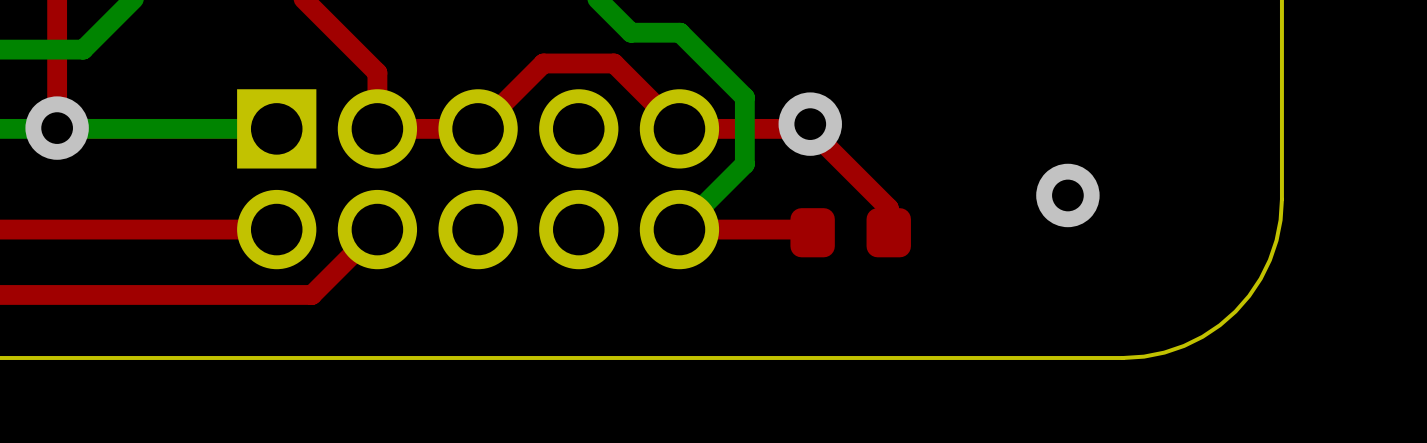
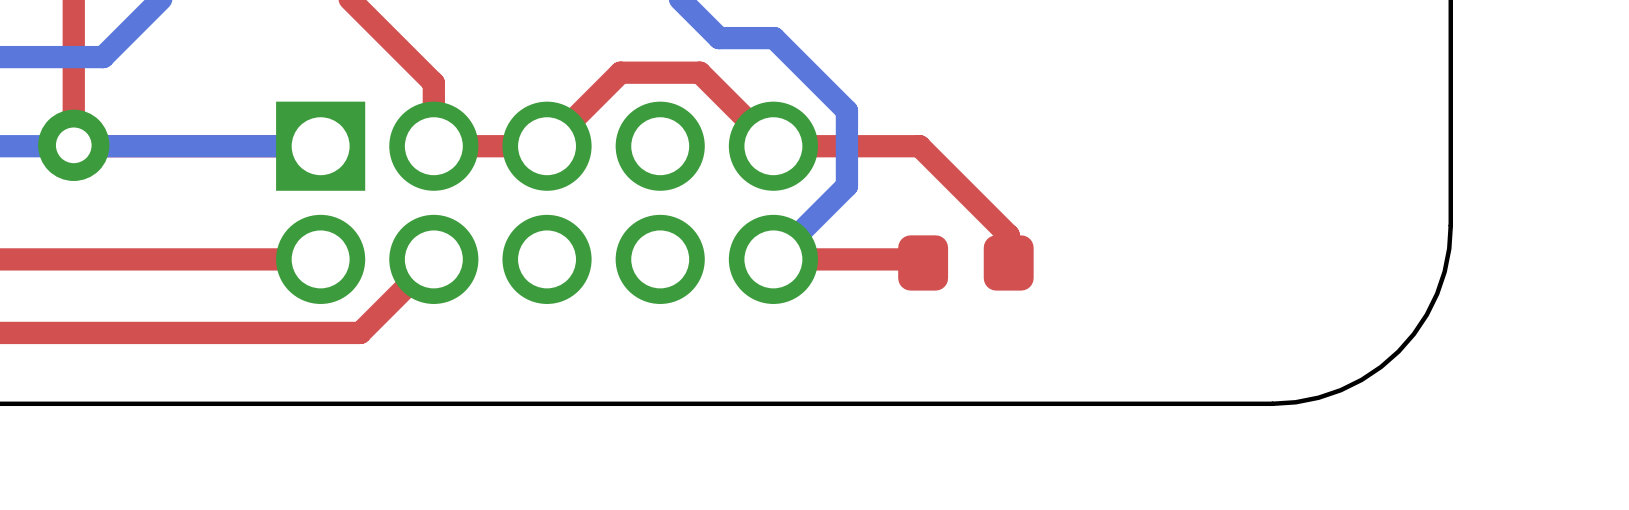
via: (810, 124) -> none
via: (1067, 195) -> none

